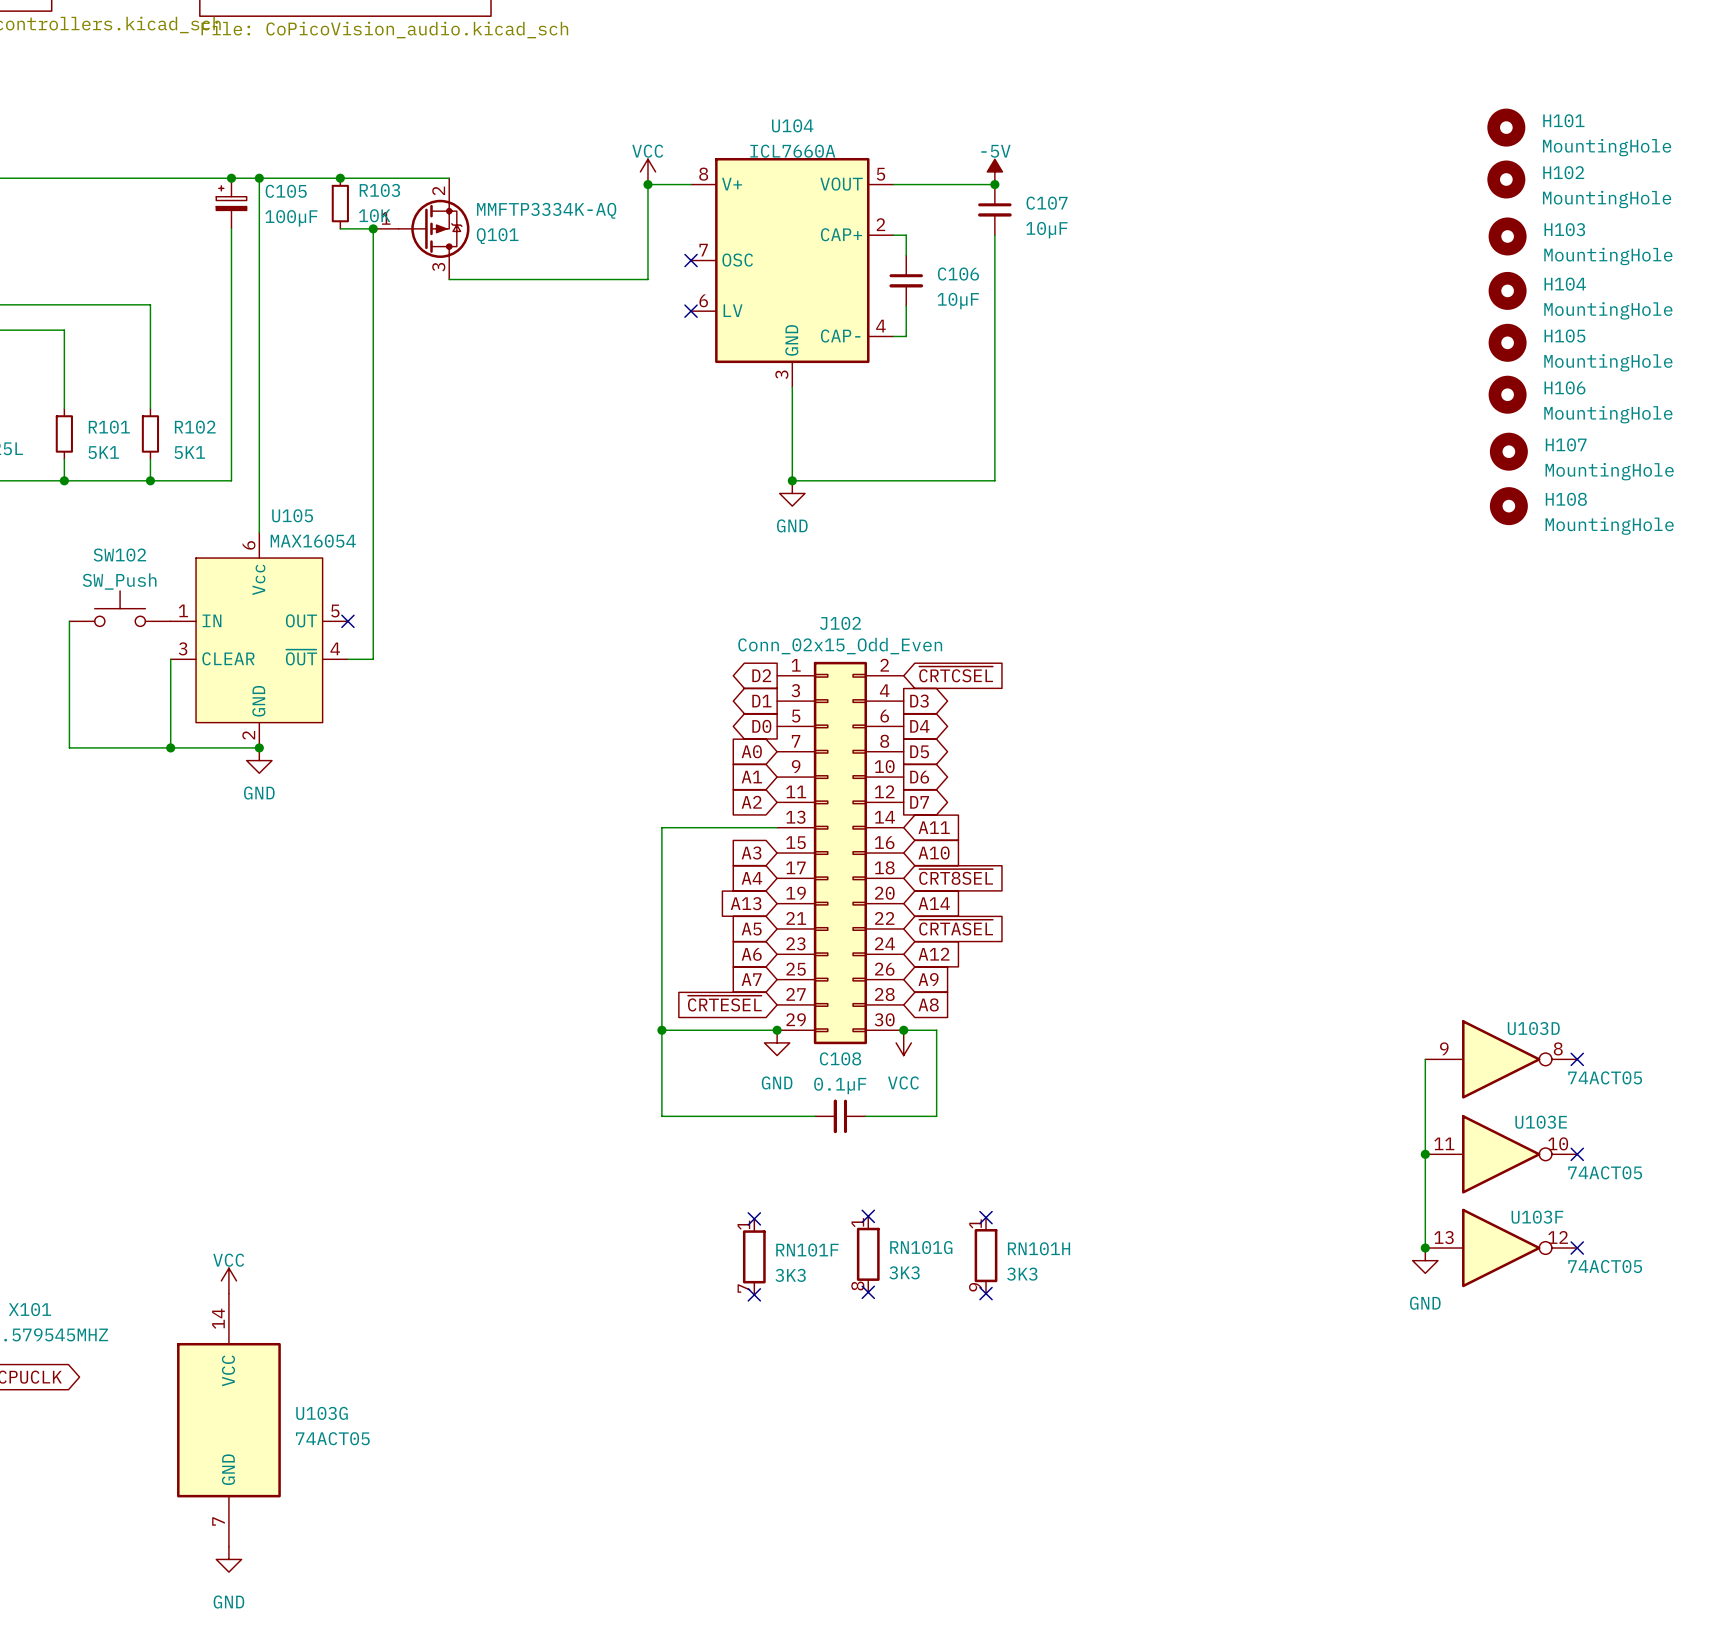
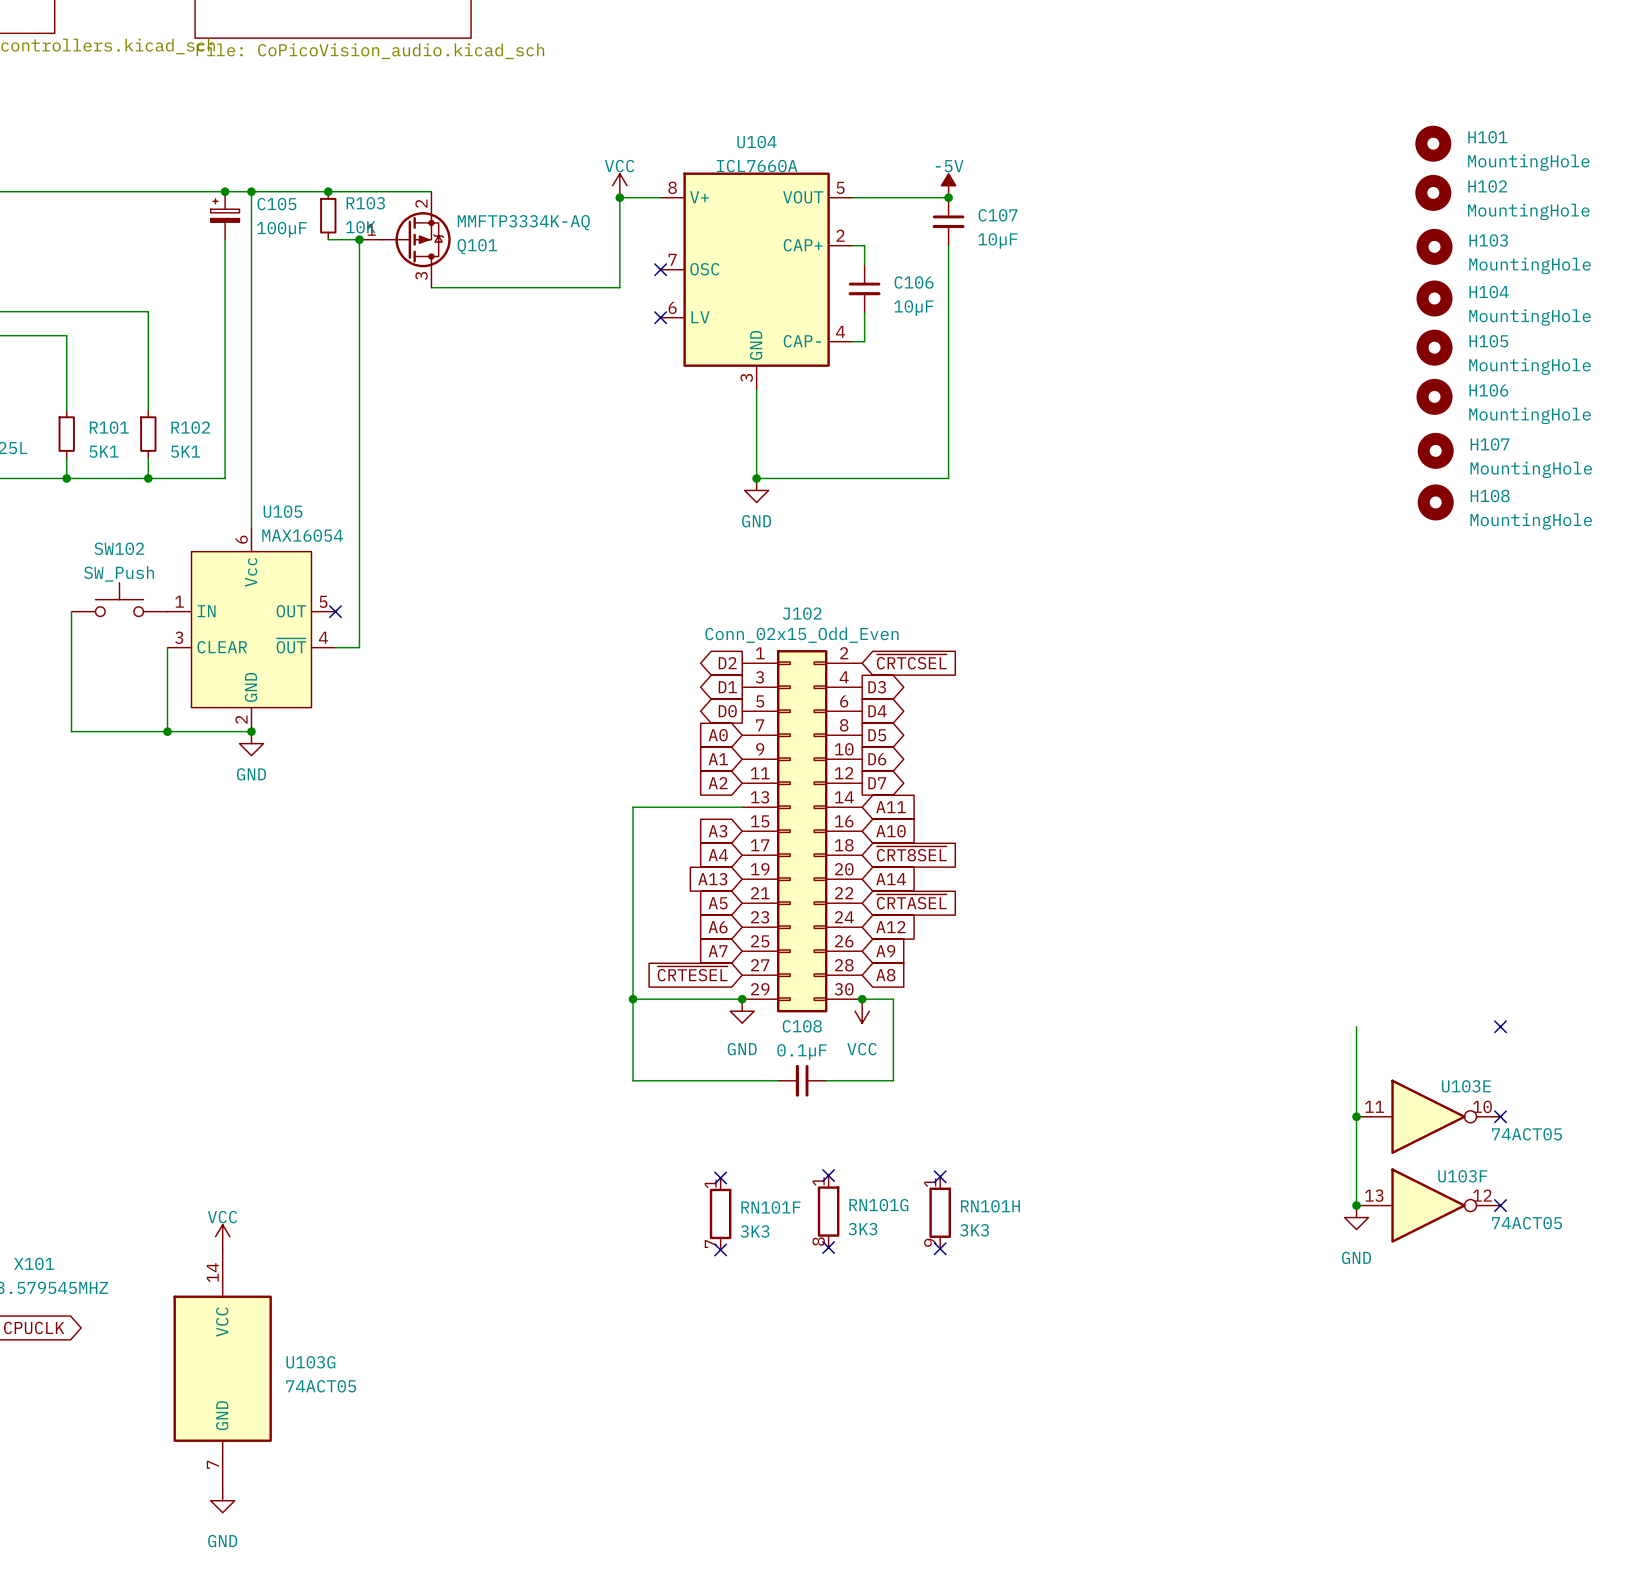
U103D: 74ACT05 (1501, 1059) -> none

